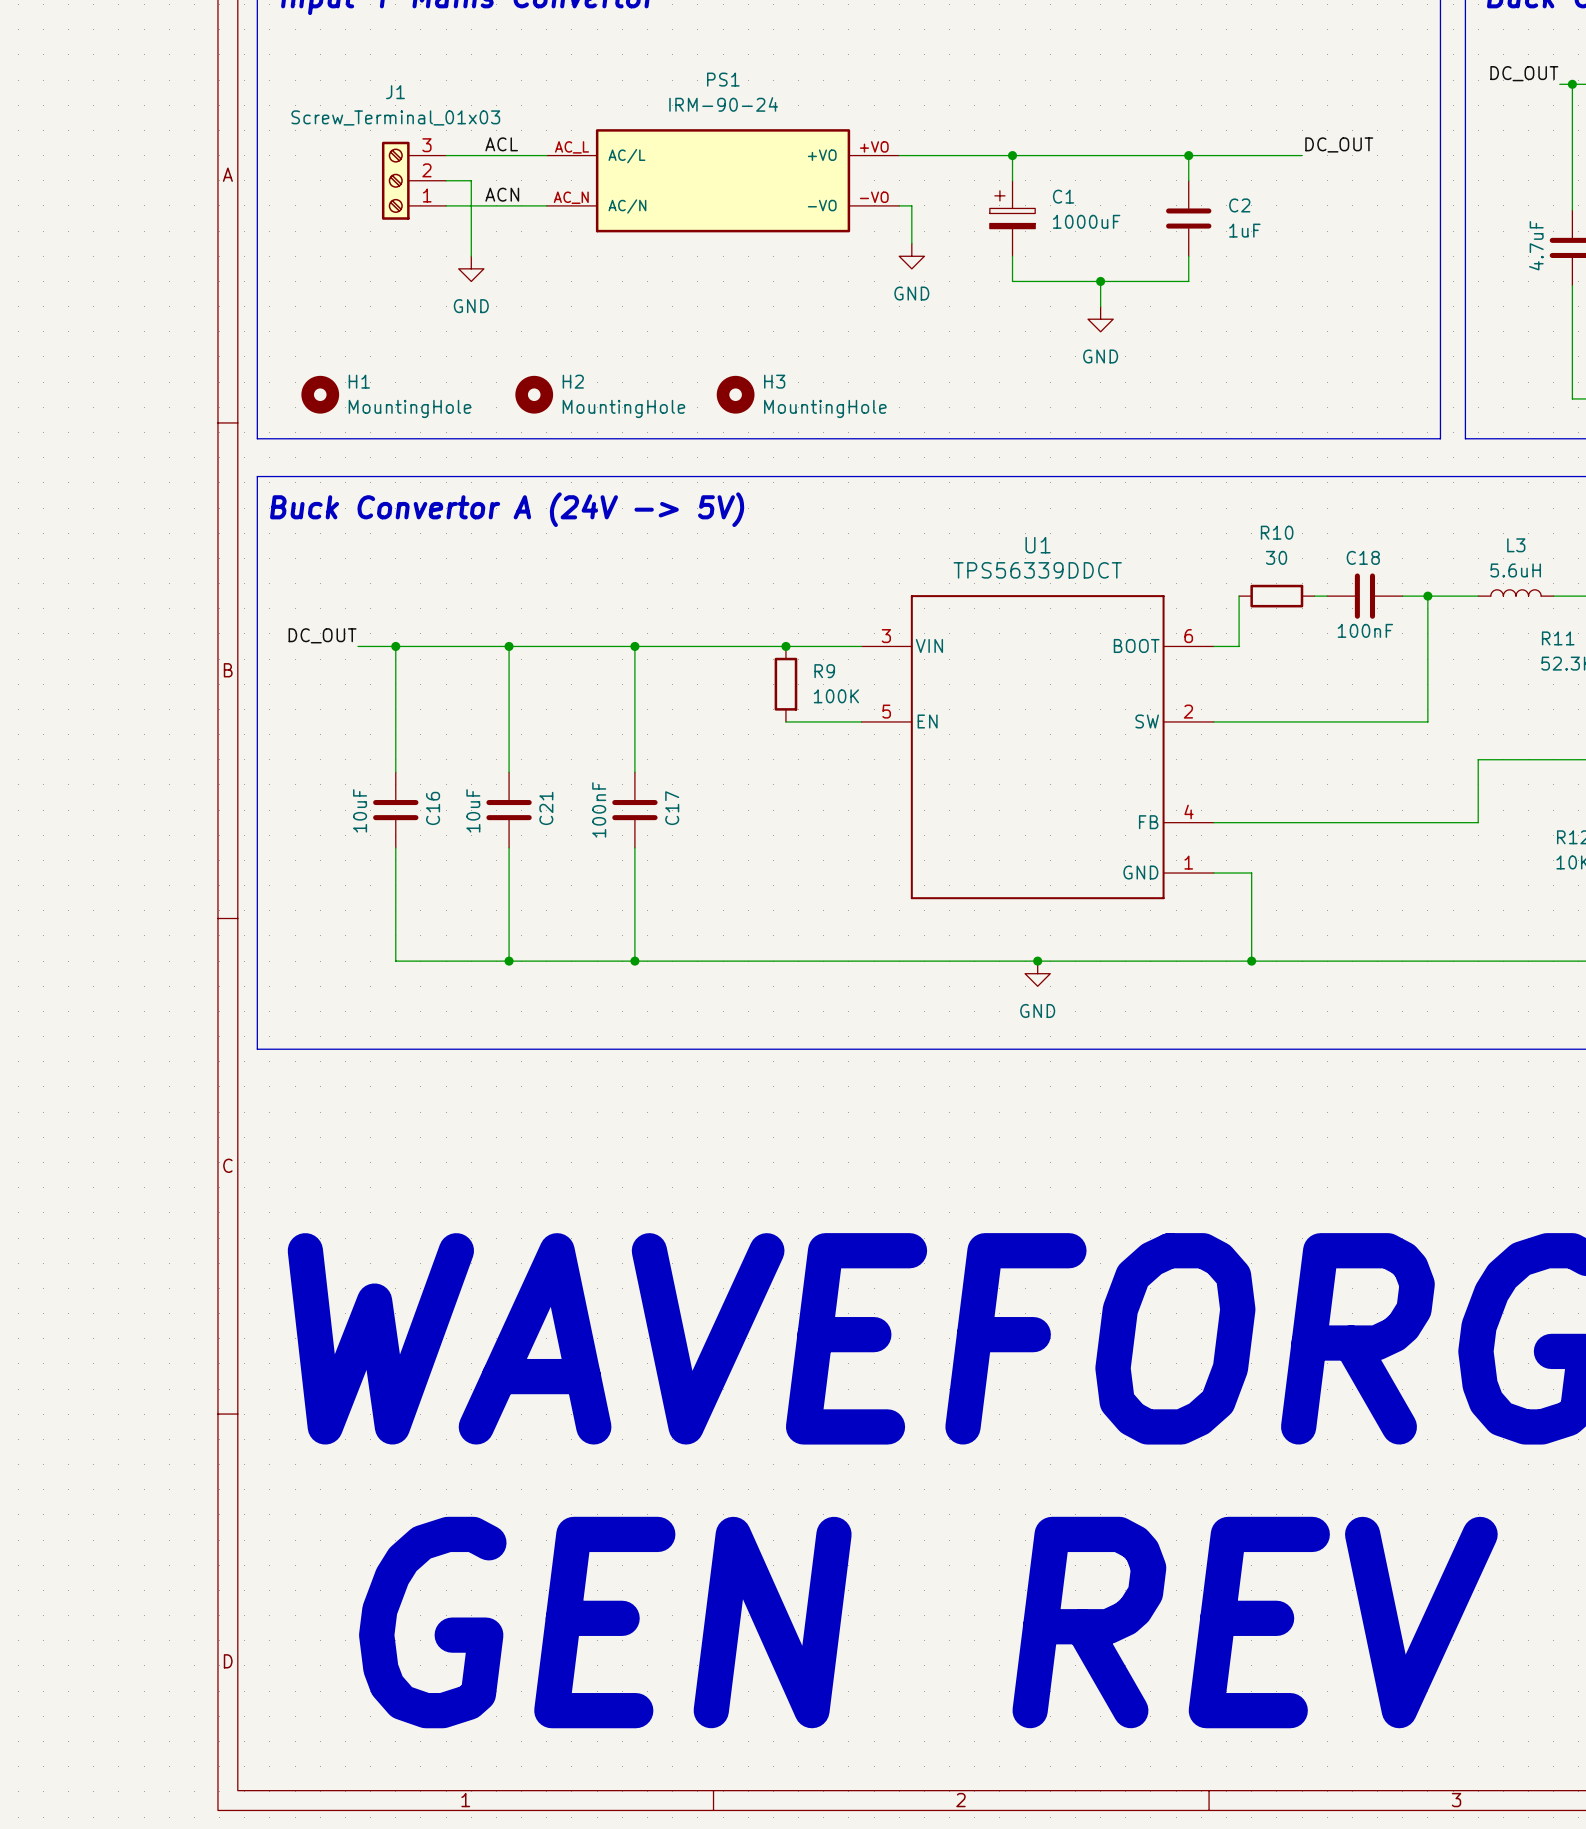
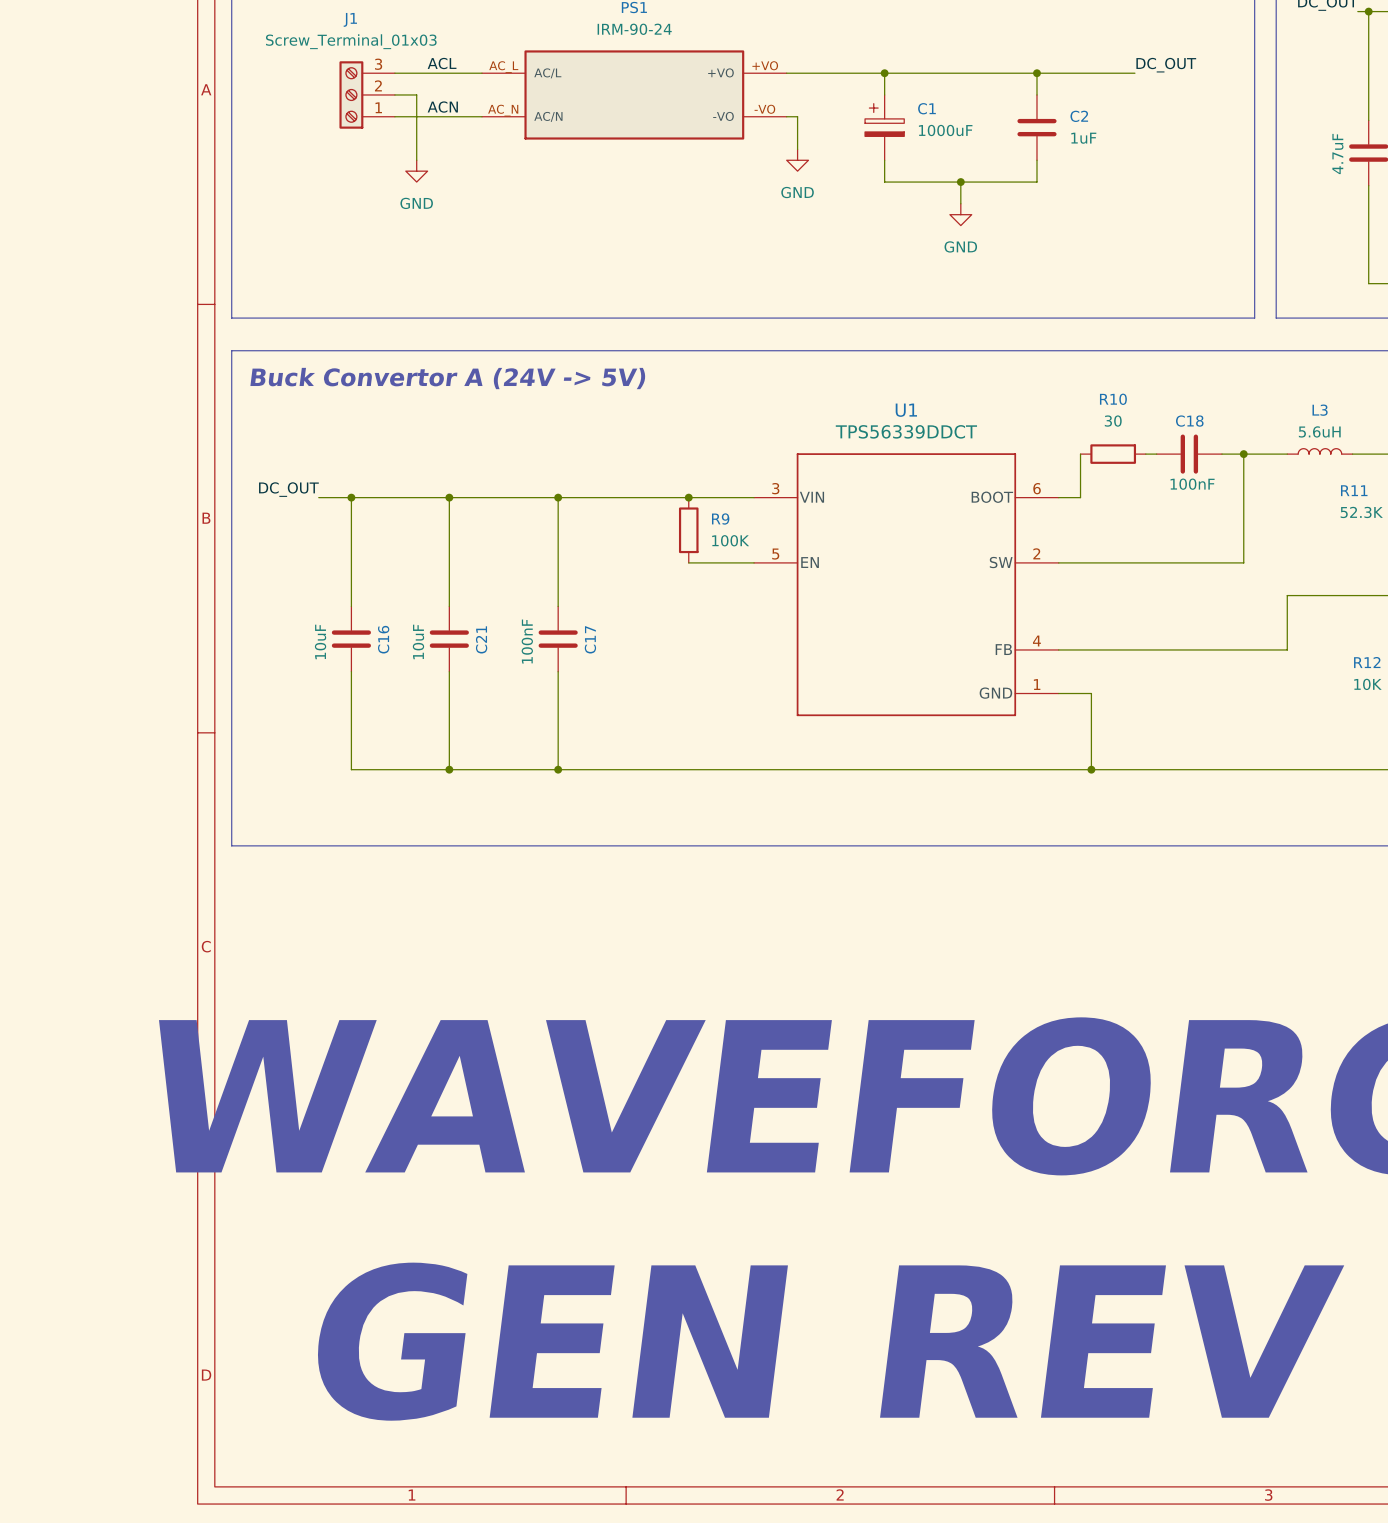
H1: MountingHole (320, 394) -> none
H2: MountingHole (534, 394) -> none
H3: MountingHole (735, 394) -> none
junction: (1037, 961) -> none
power symbol: GND (1037, 973) -> none

